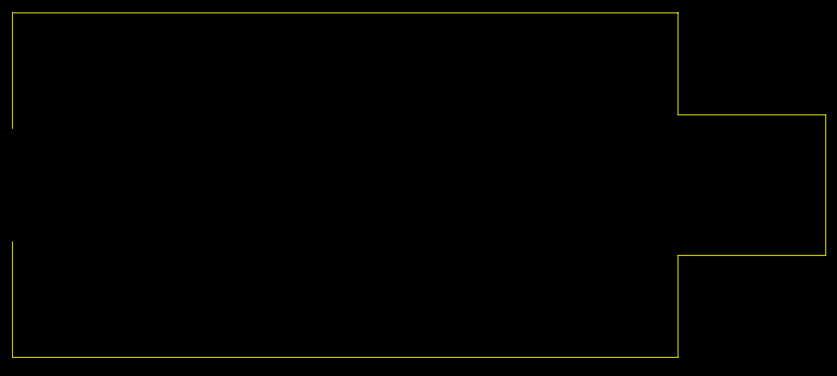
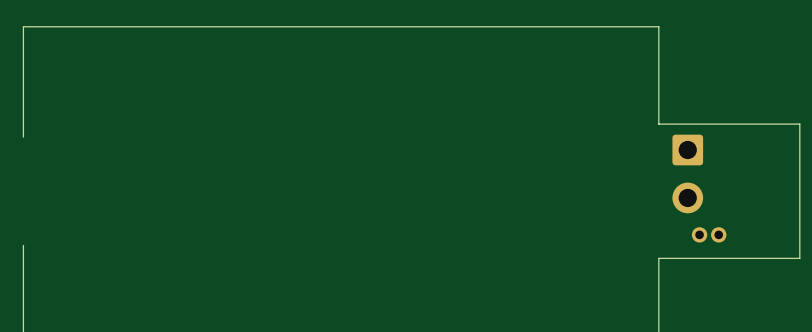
part: none -> (699, 188)

